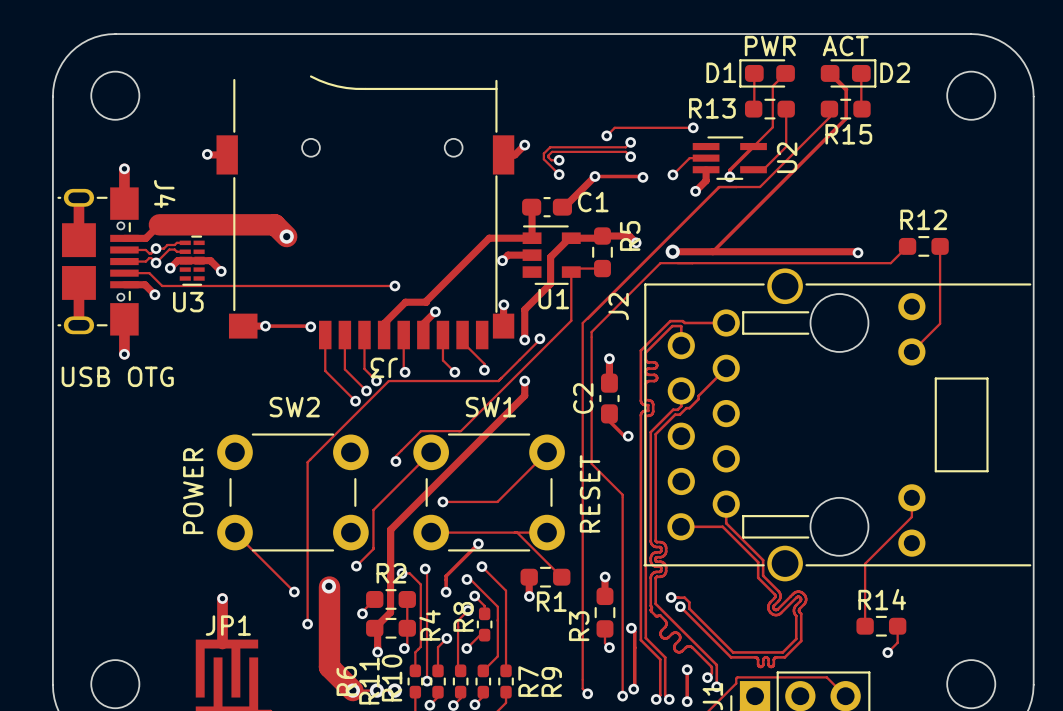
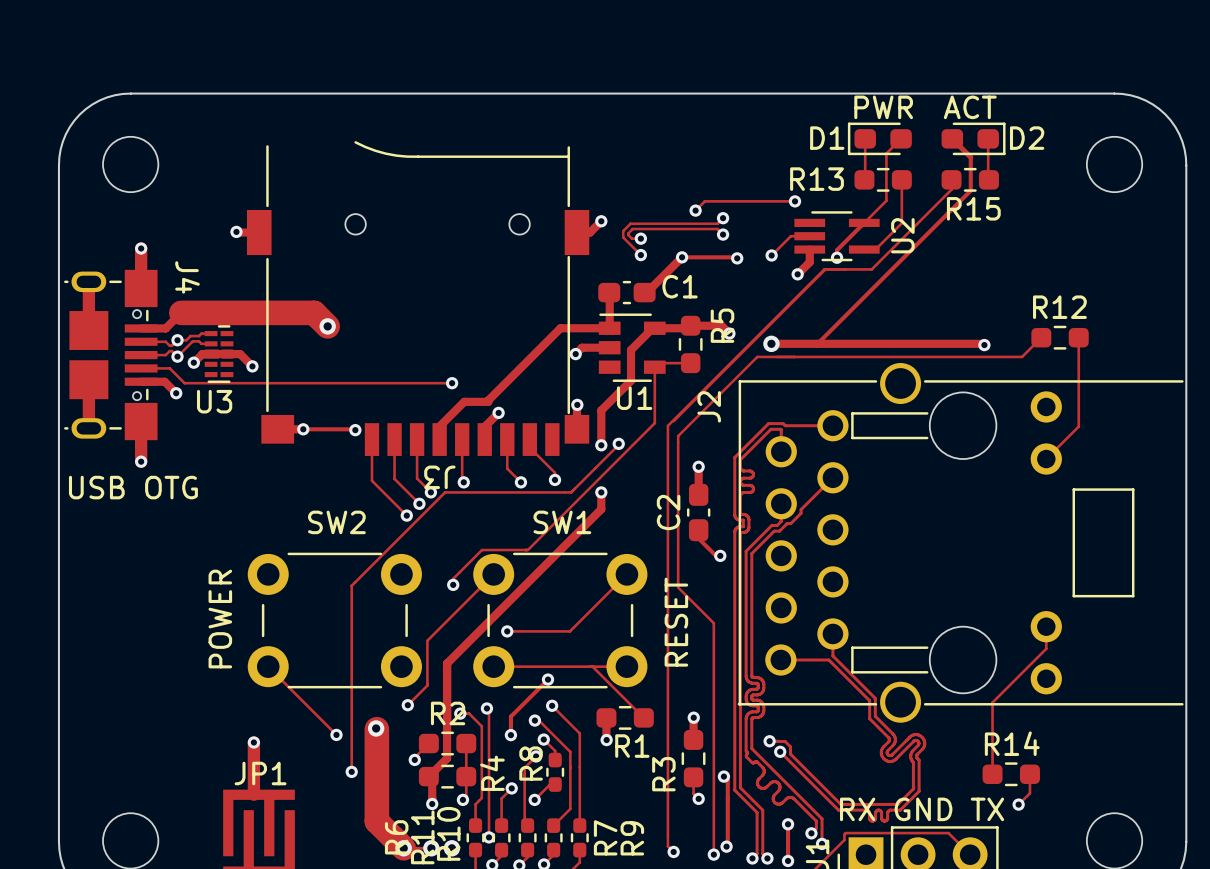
text: none -> RX GND TX (922, 809)

